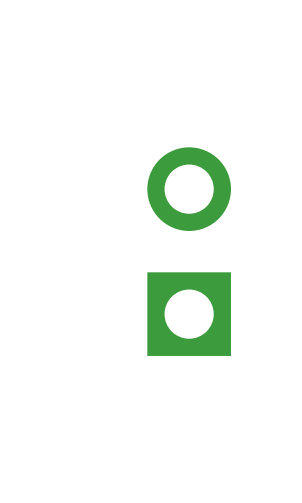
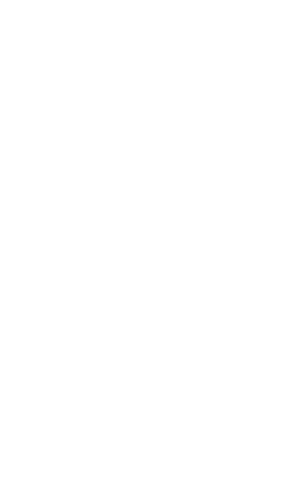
part: (189, 251) -> none

